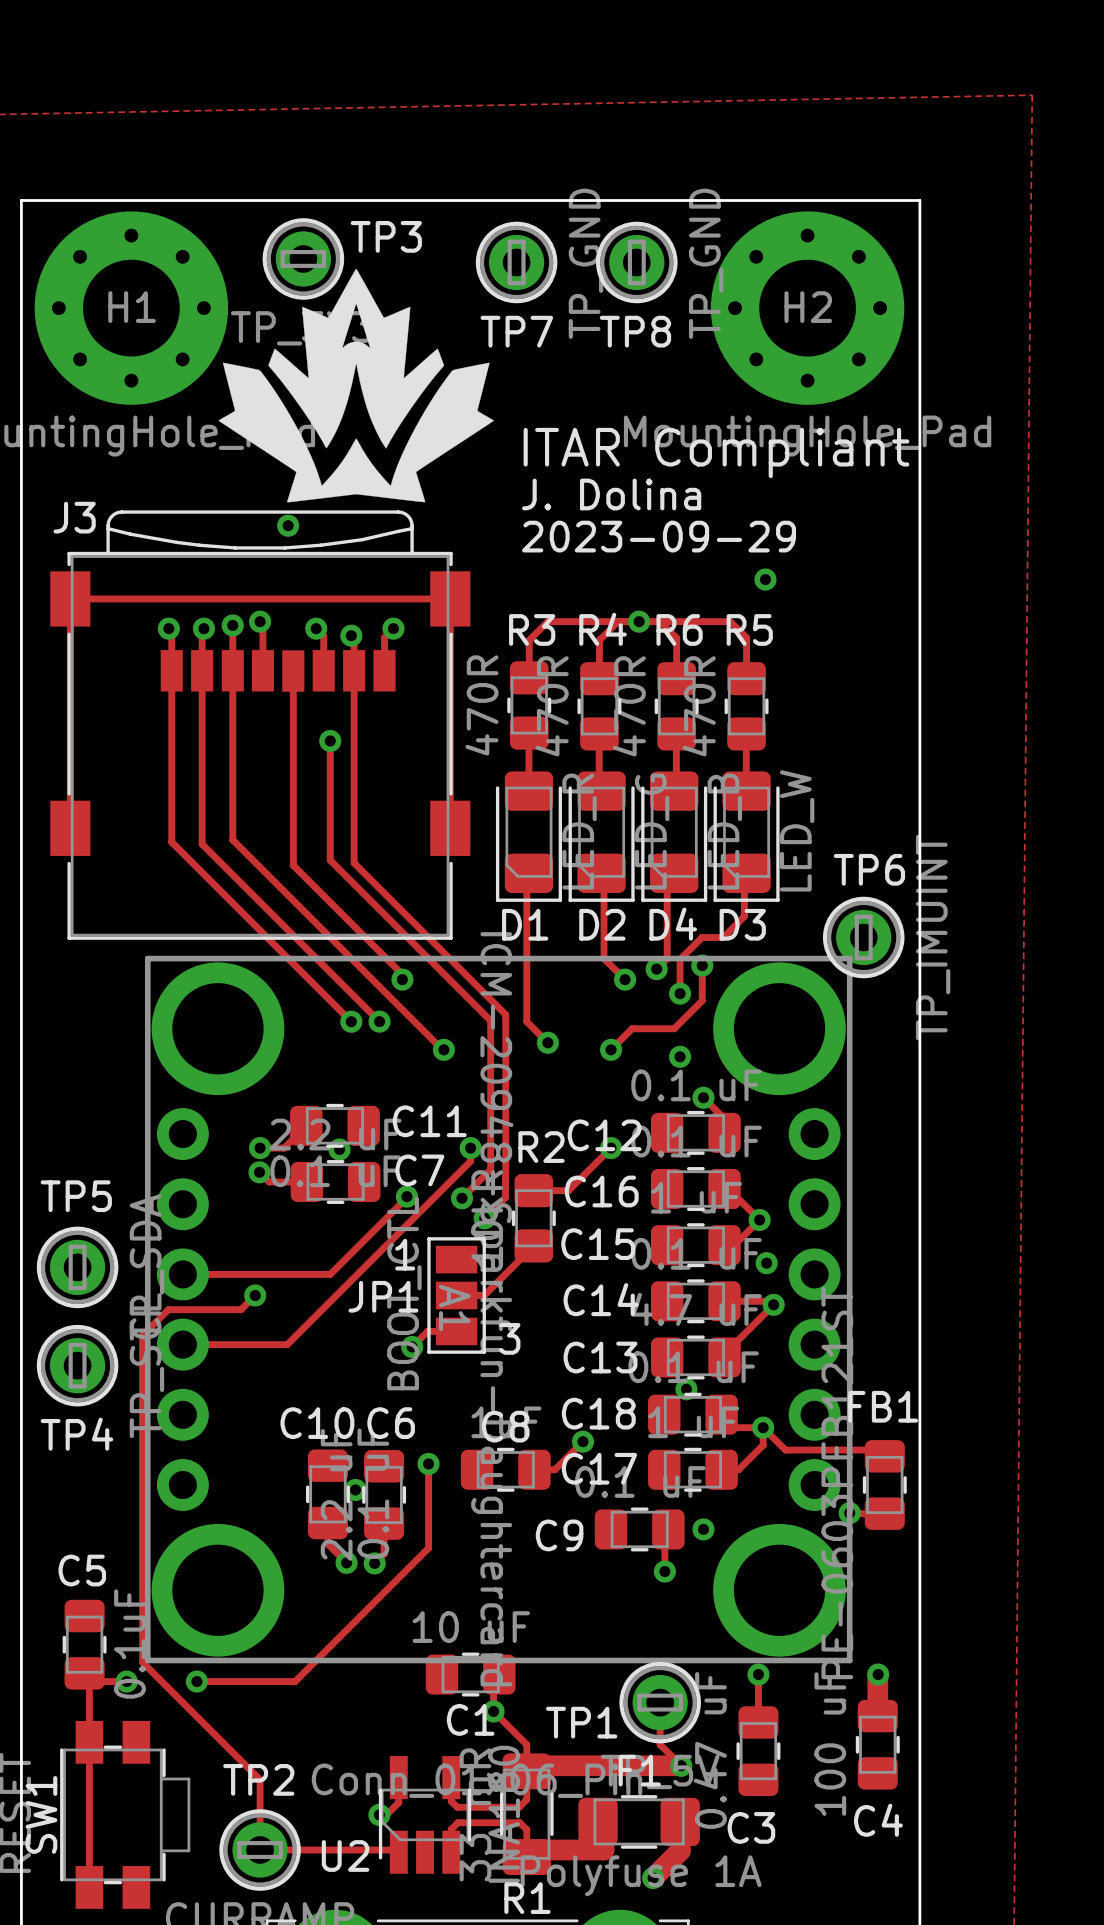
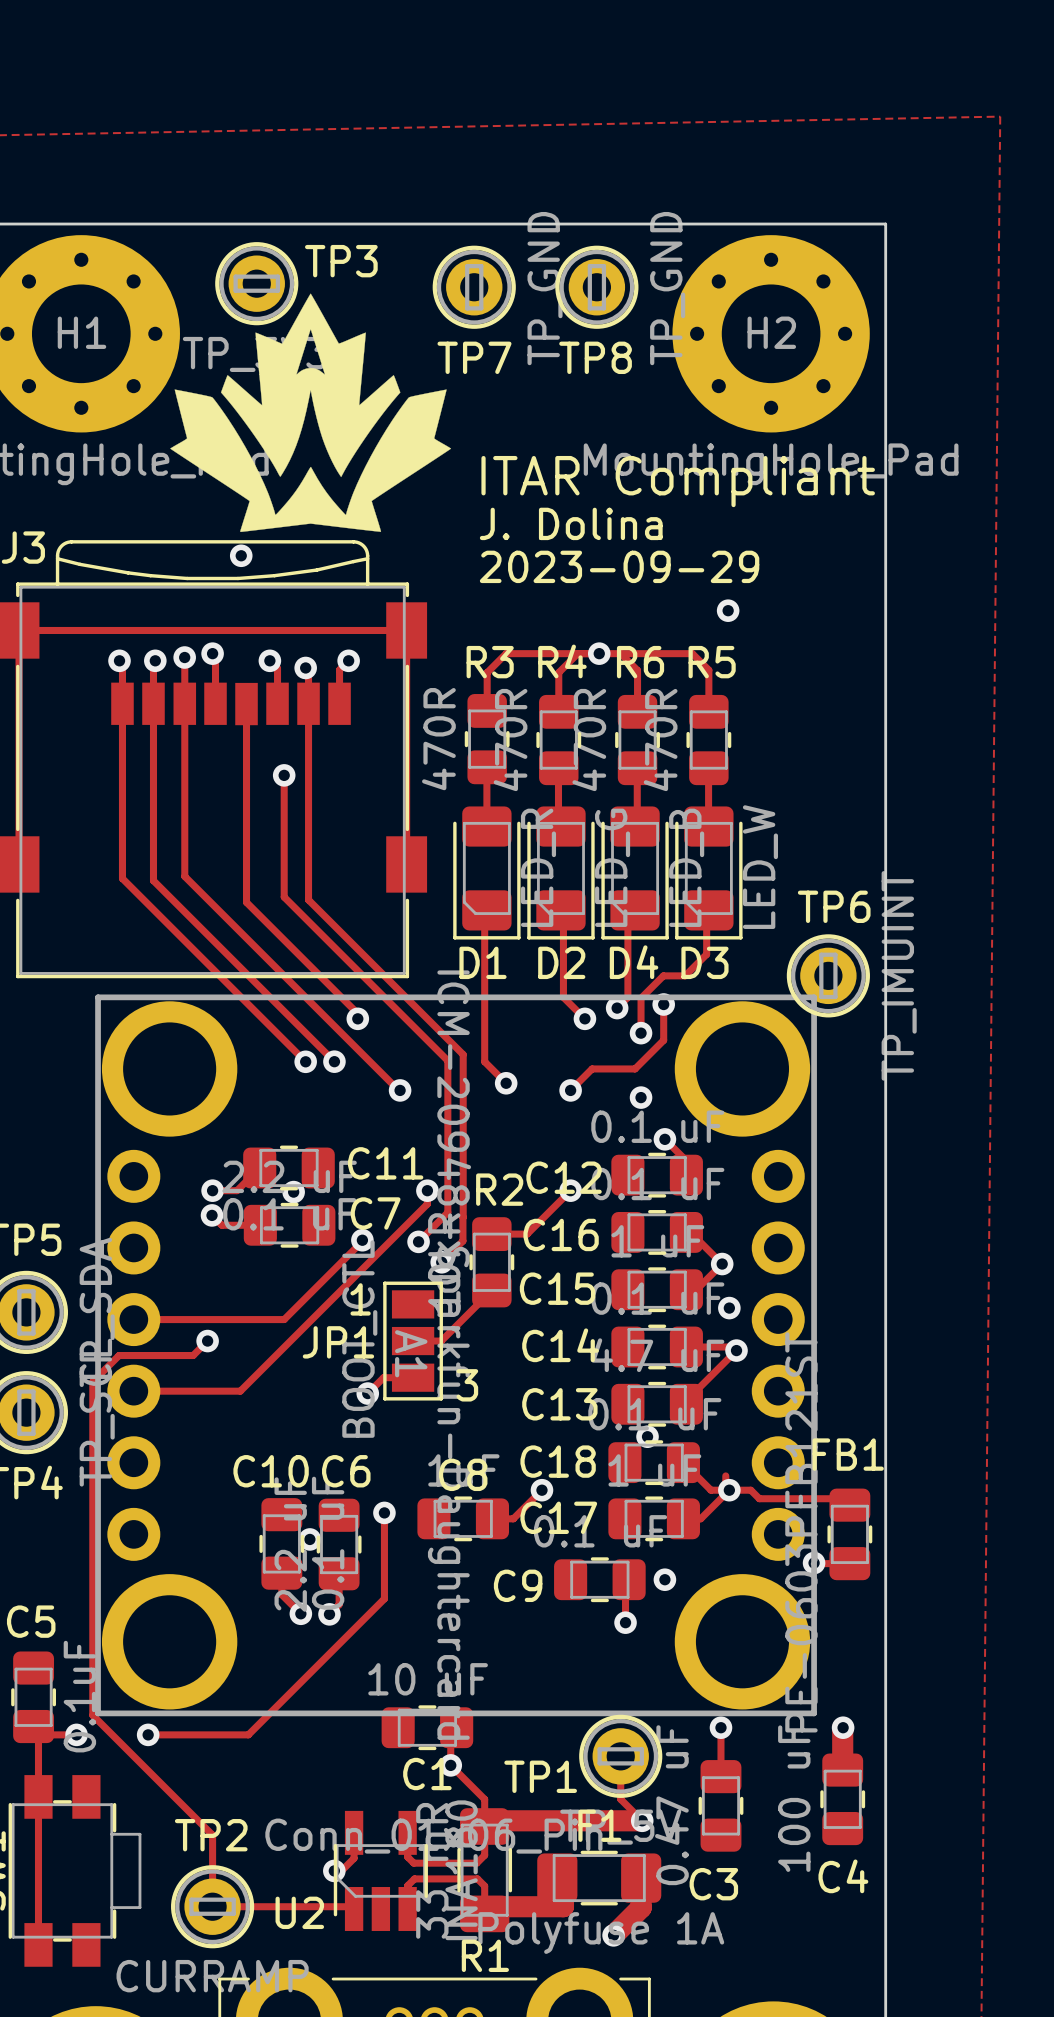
track: (734, 1427) (763, 1427) (785, 1450) (796, 1450) -> (696, 1475) (710, 1490) (750, 1490) (759, 1498)
via position: (763, 1427) -> (729, 1490)

